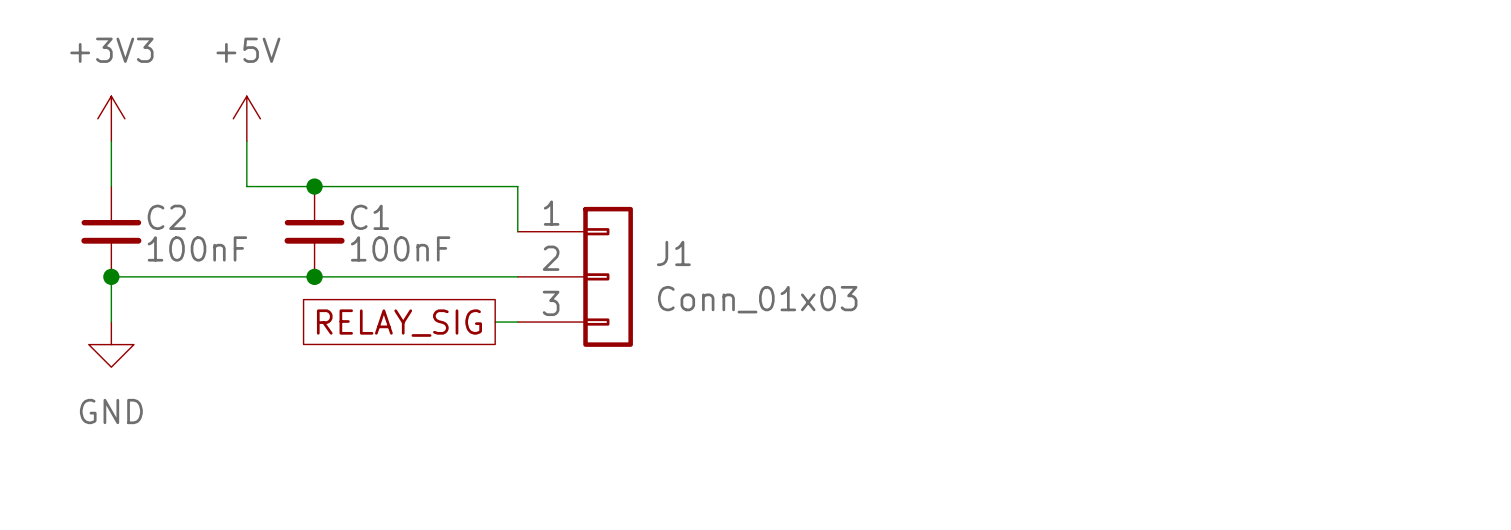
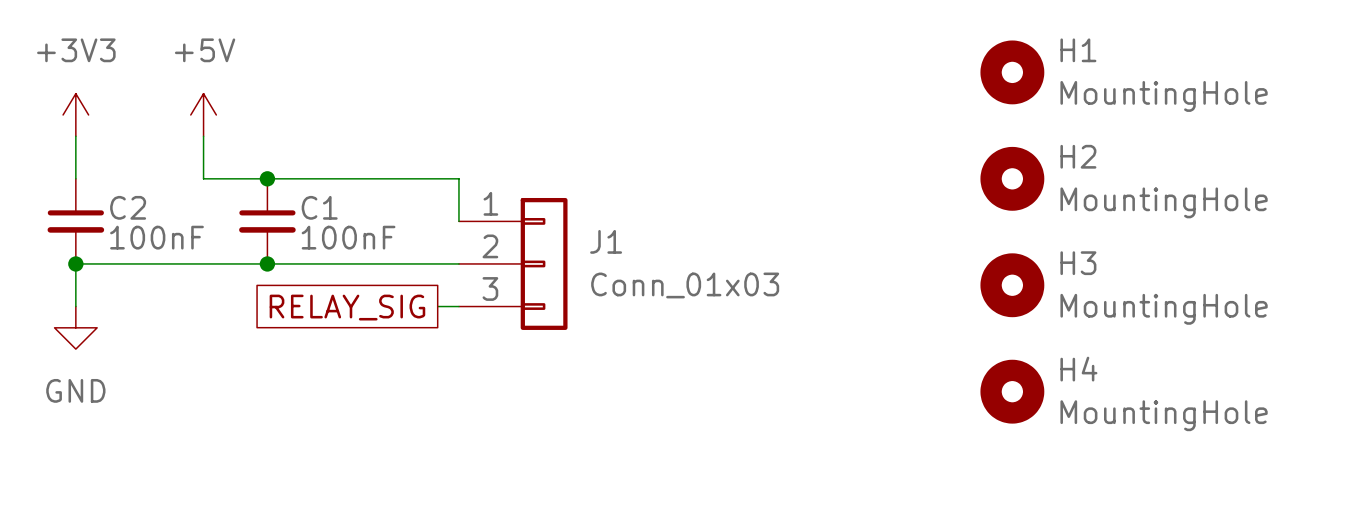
H1: none -> MountingHole (1012, 72)
H2: none -> MountingHole (1012, 178)
H3: none -> MountingHole (1012, 285)
H4: none -> MountingHole (1012, 391)

